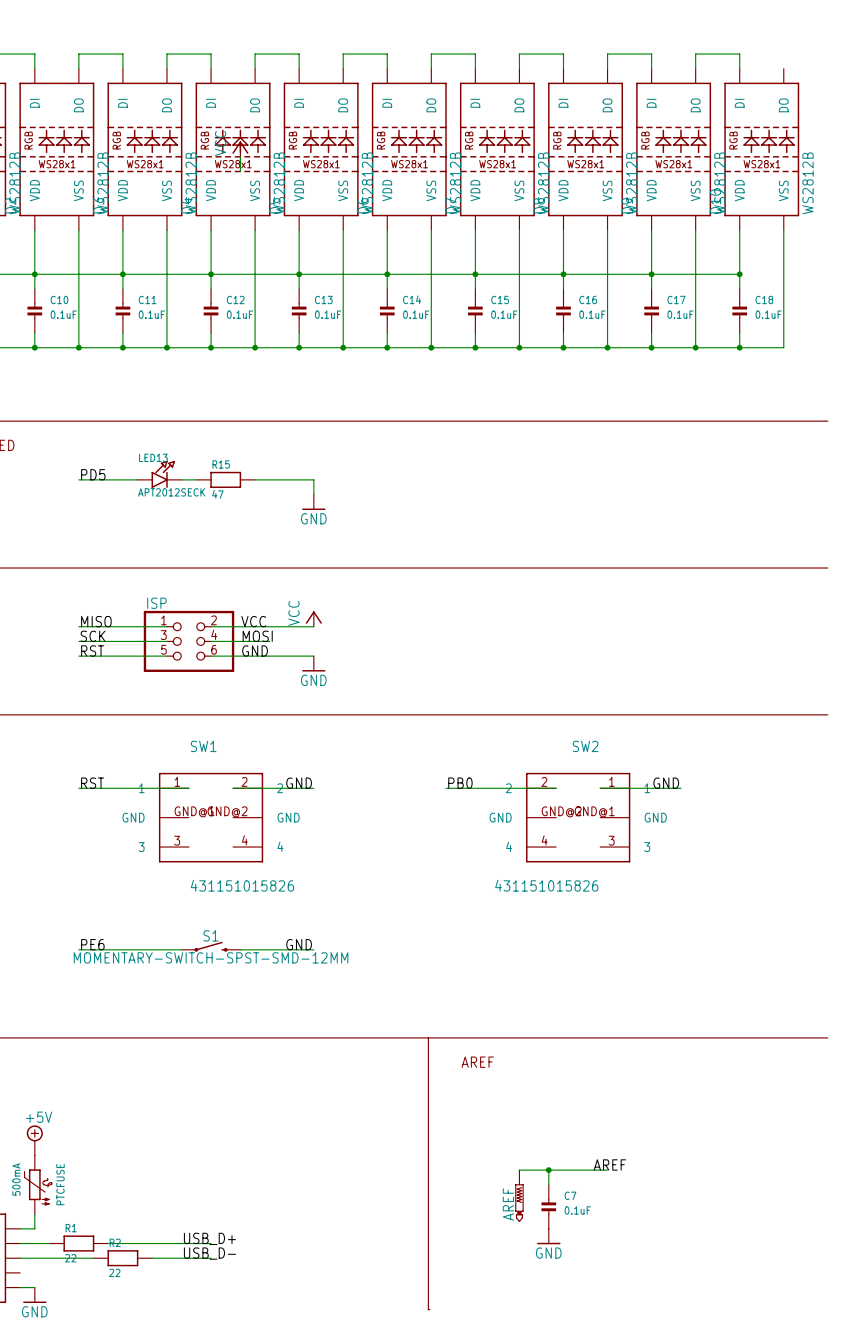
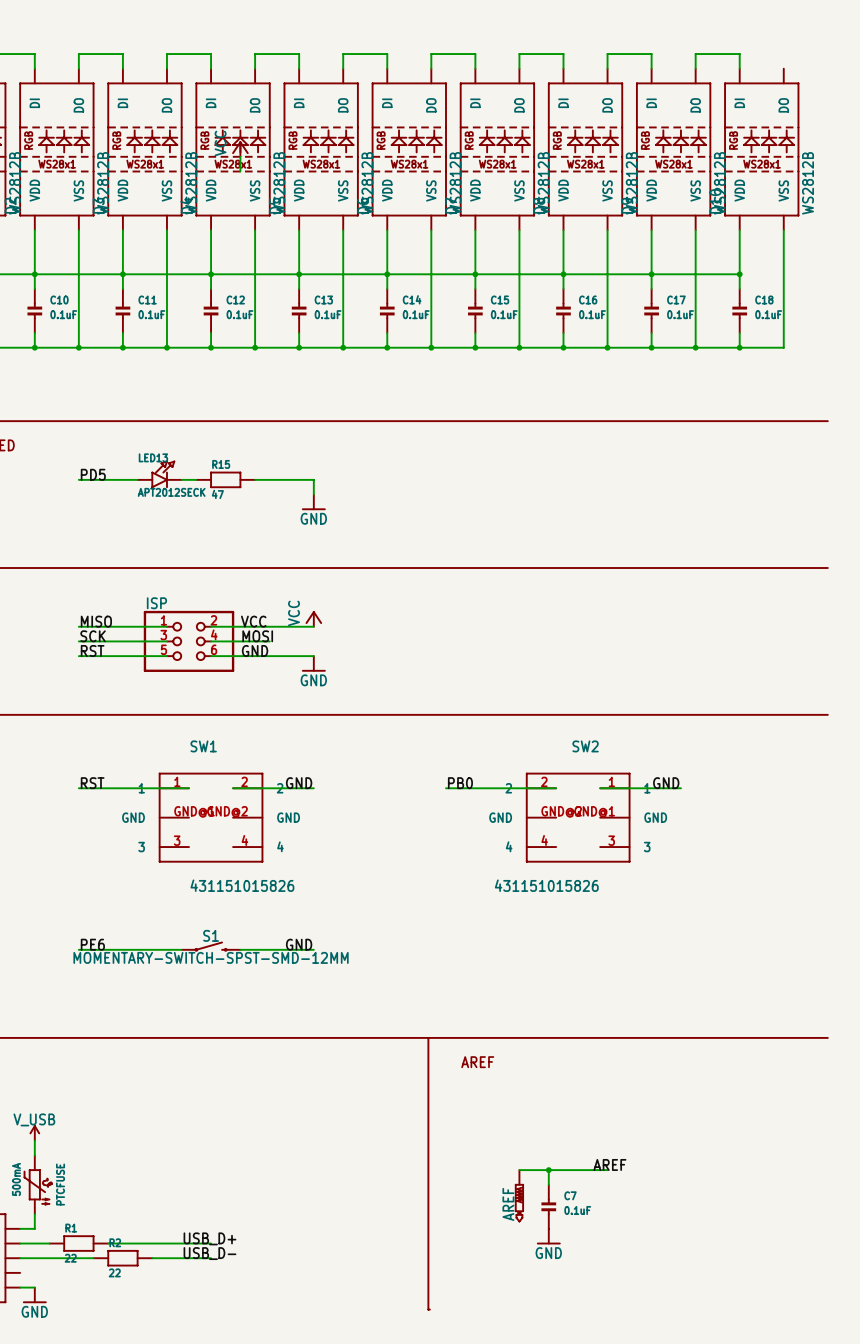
power symbol: none -> V_USB (34, 1133)
power symbol: +5V (34, 1140) -> none

